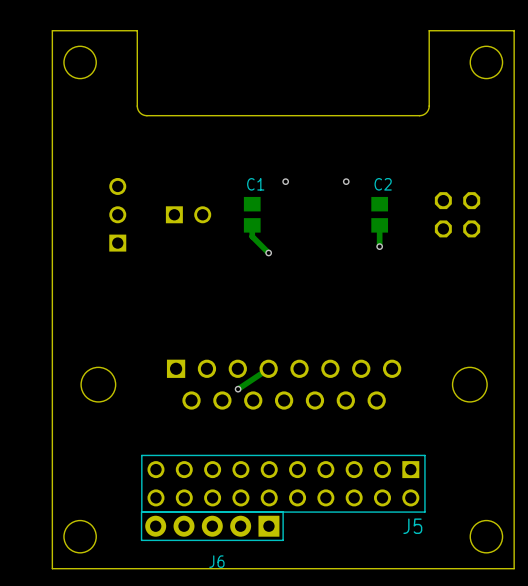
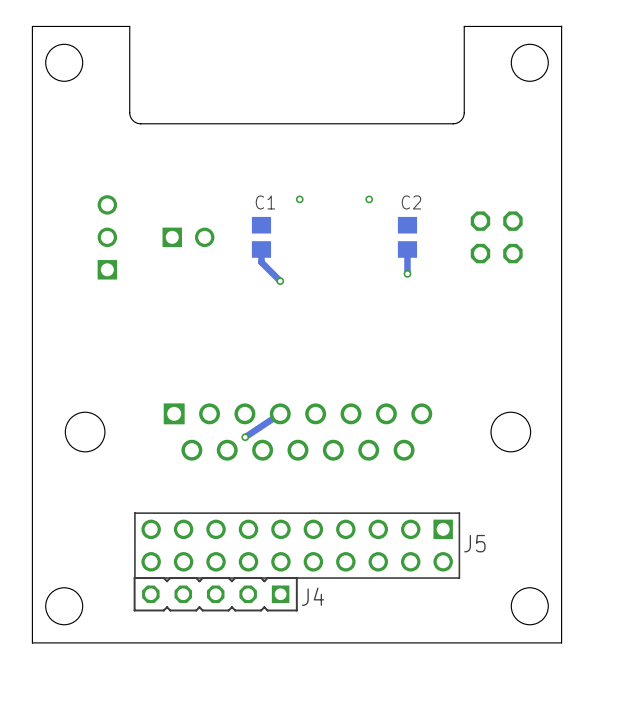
J6: (212, 526) -> none
J4: none -> (215, 594)
J5 name position: J5 (412, 526) -> J5 (474, 543)

